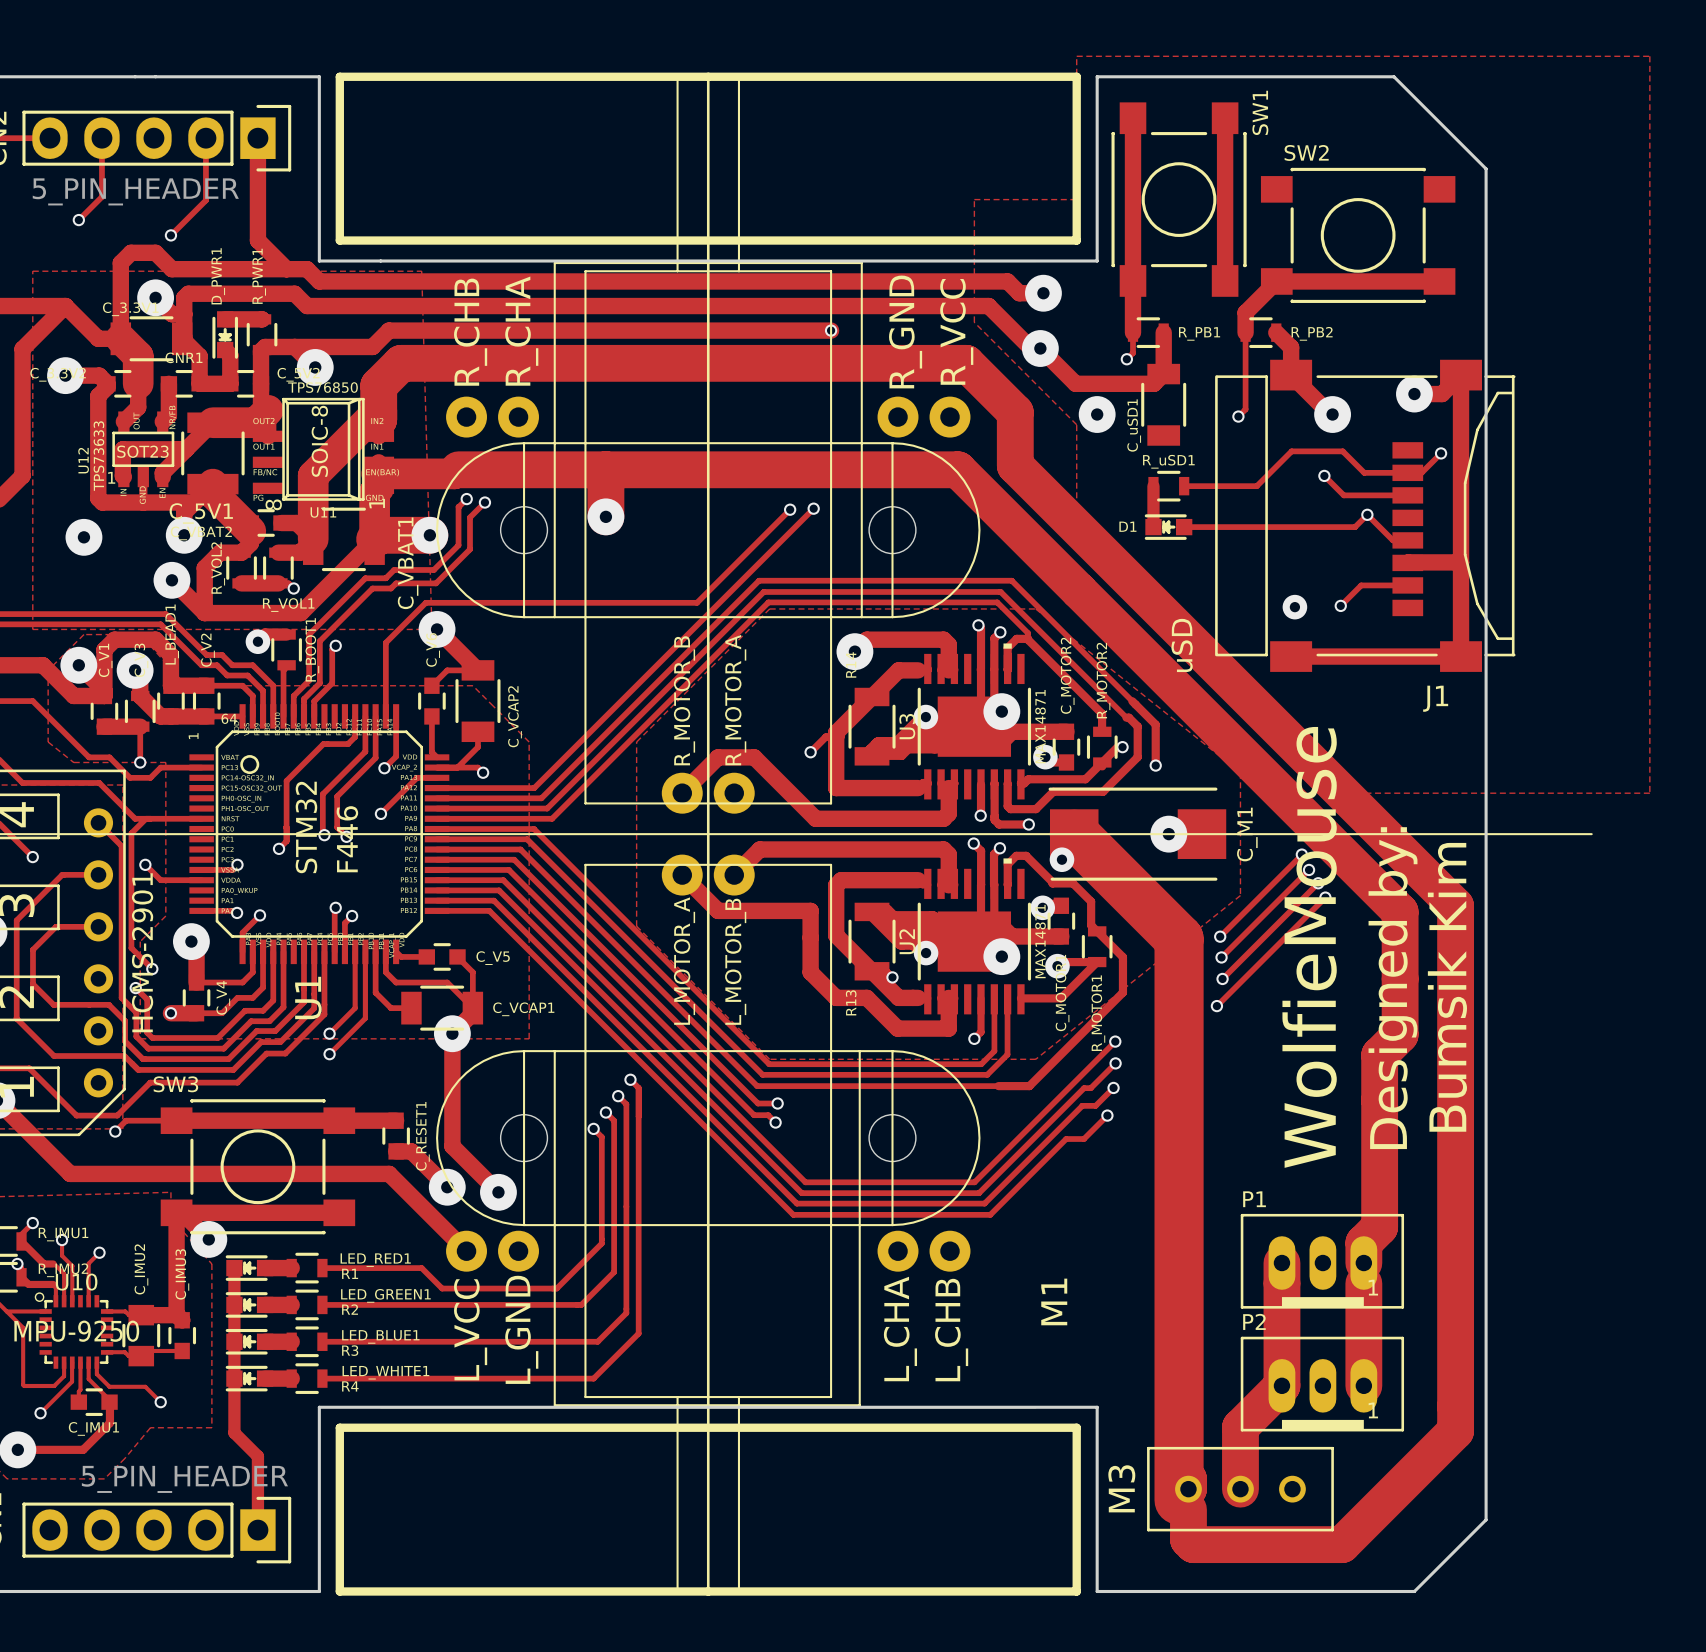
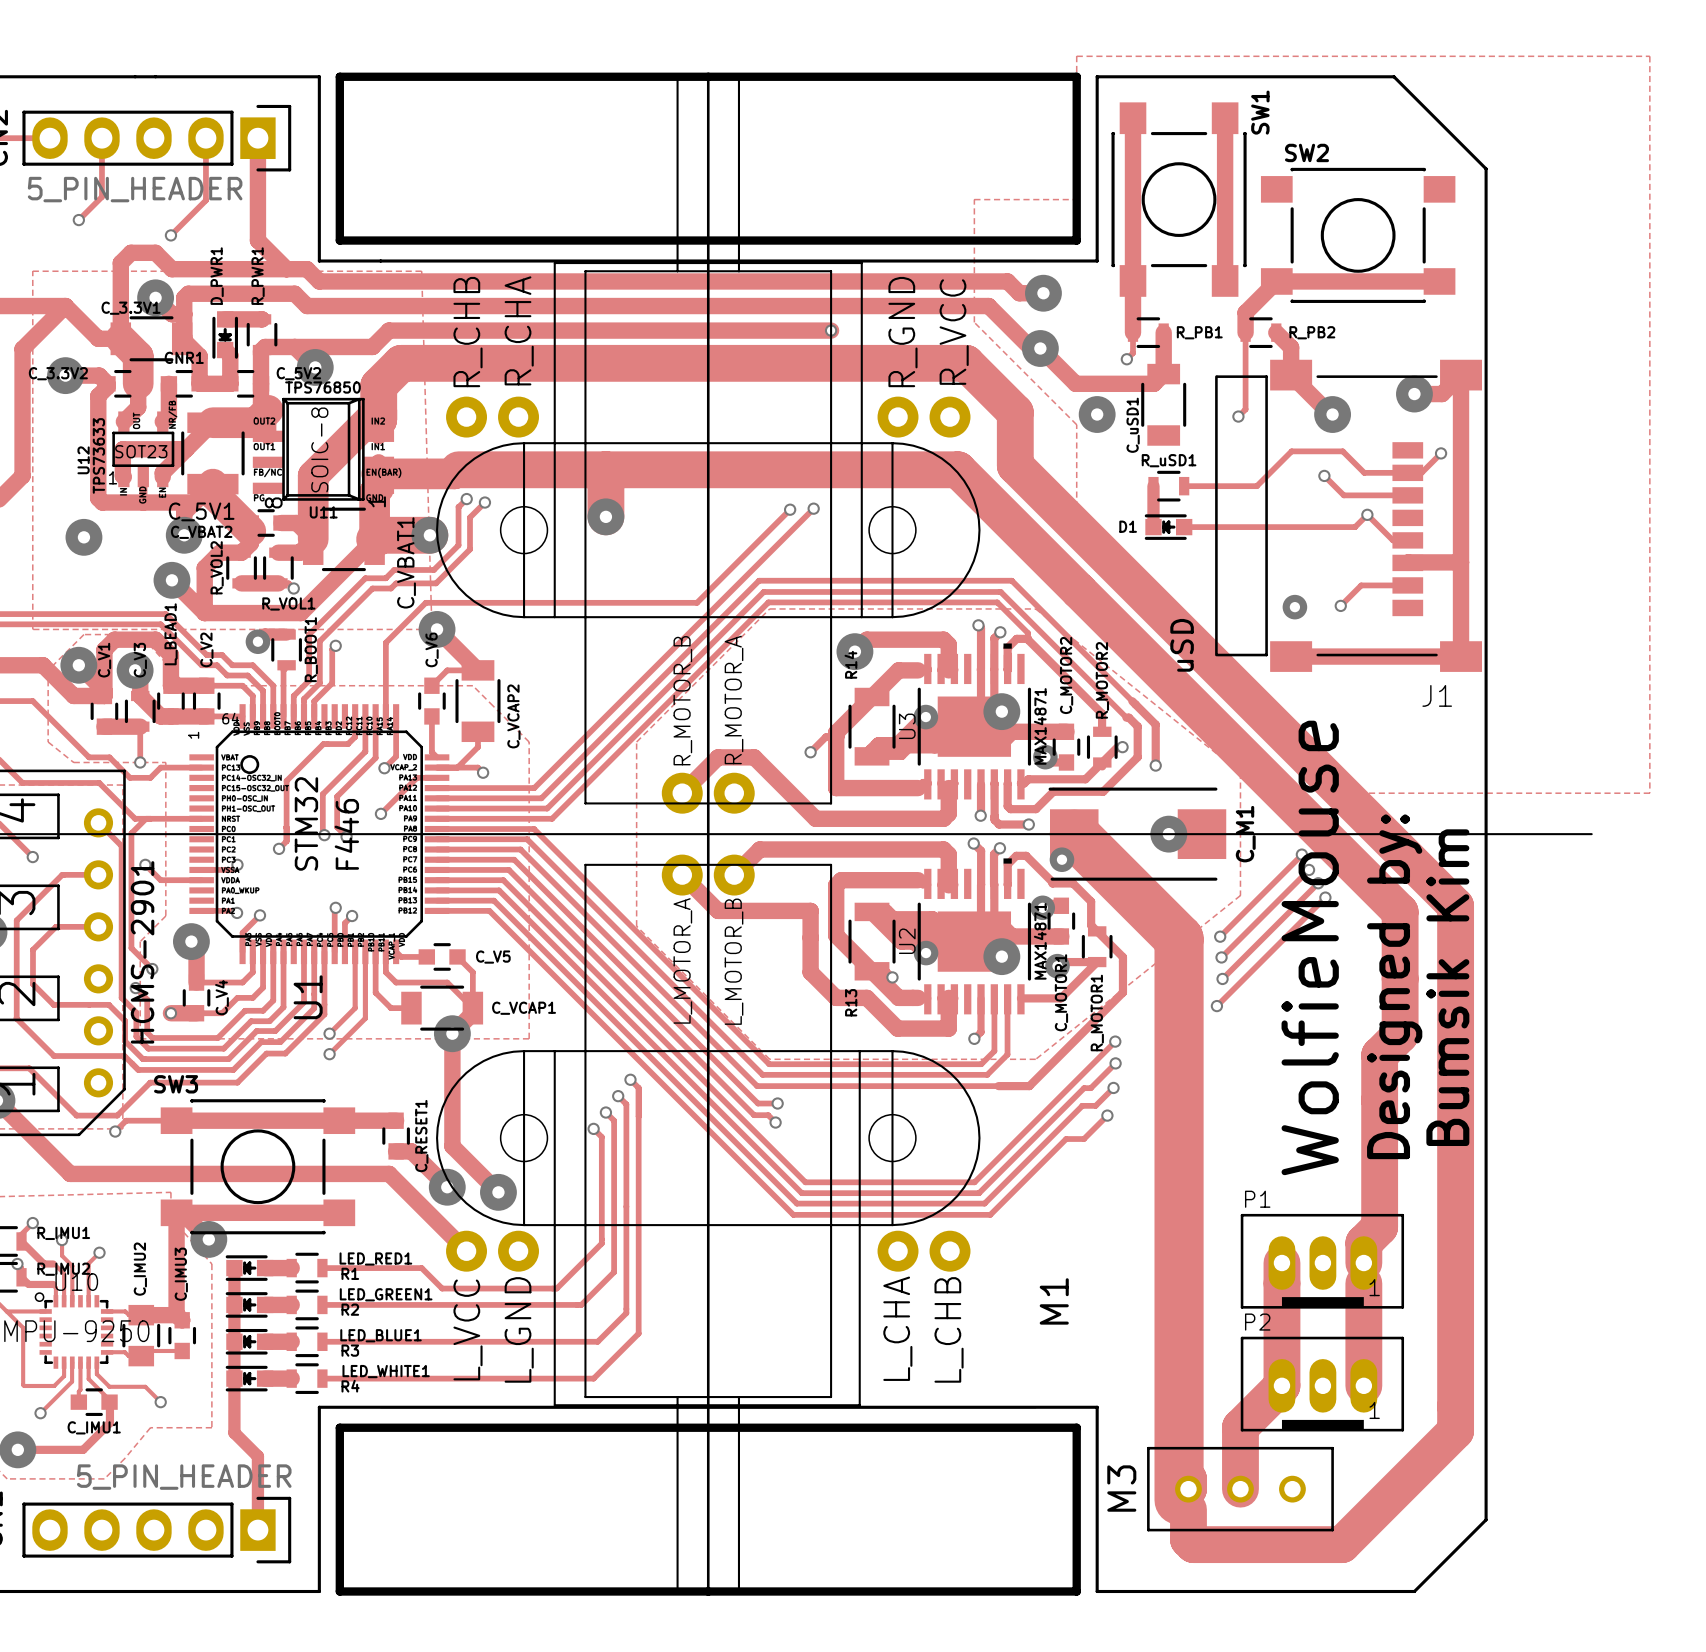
J1 footprint: [1215, 359, 1516, 672] -> [1215, 359, 1483, 672]

